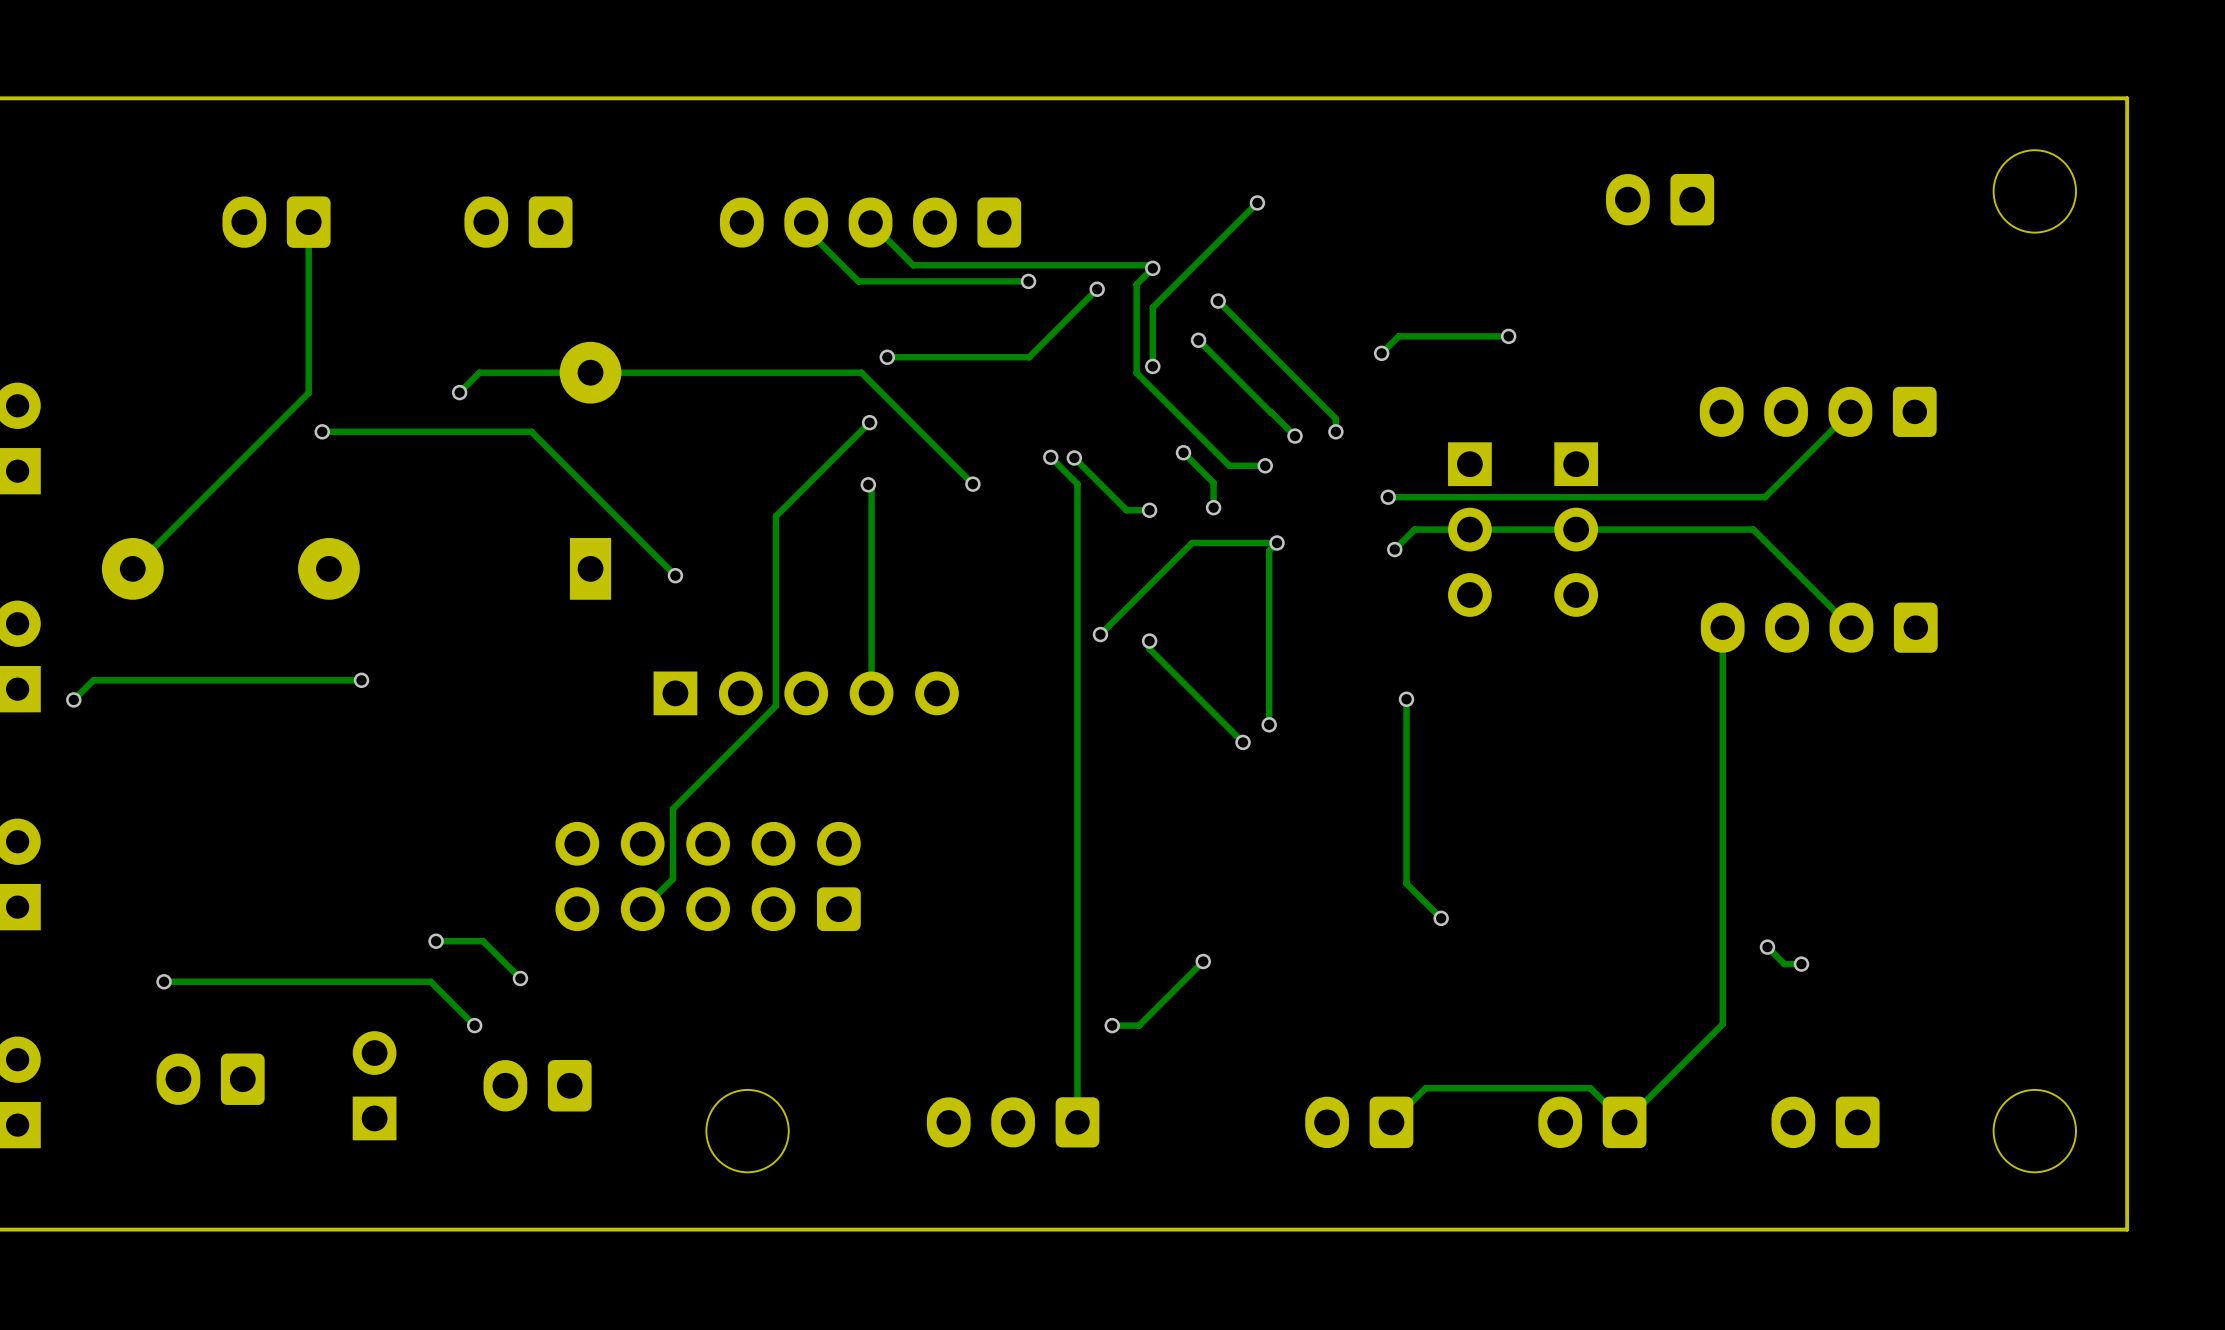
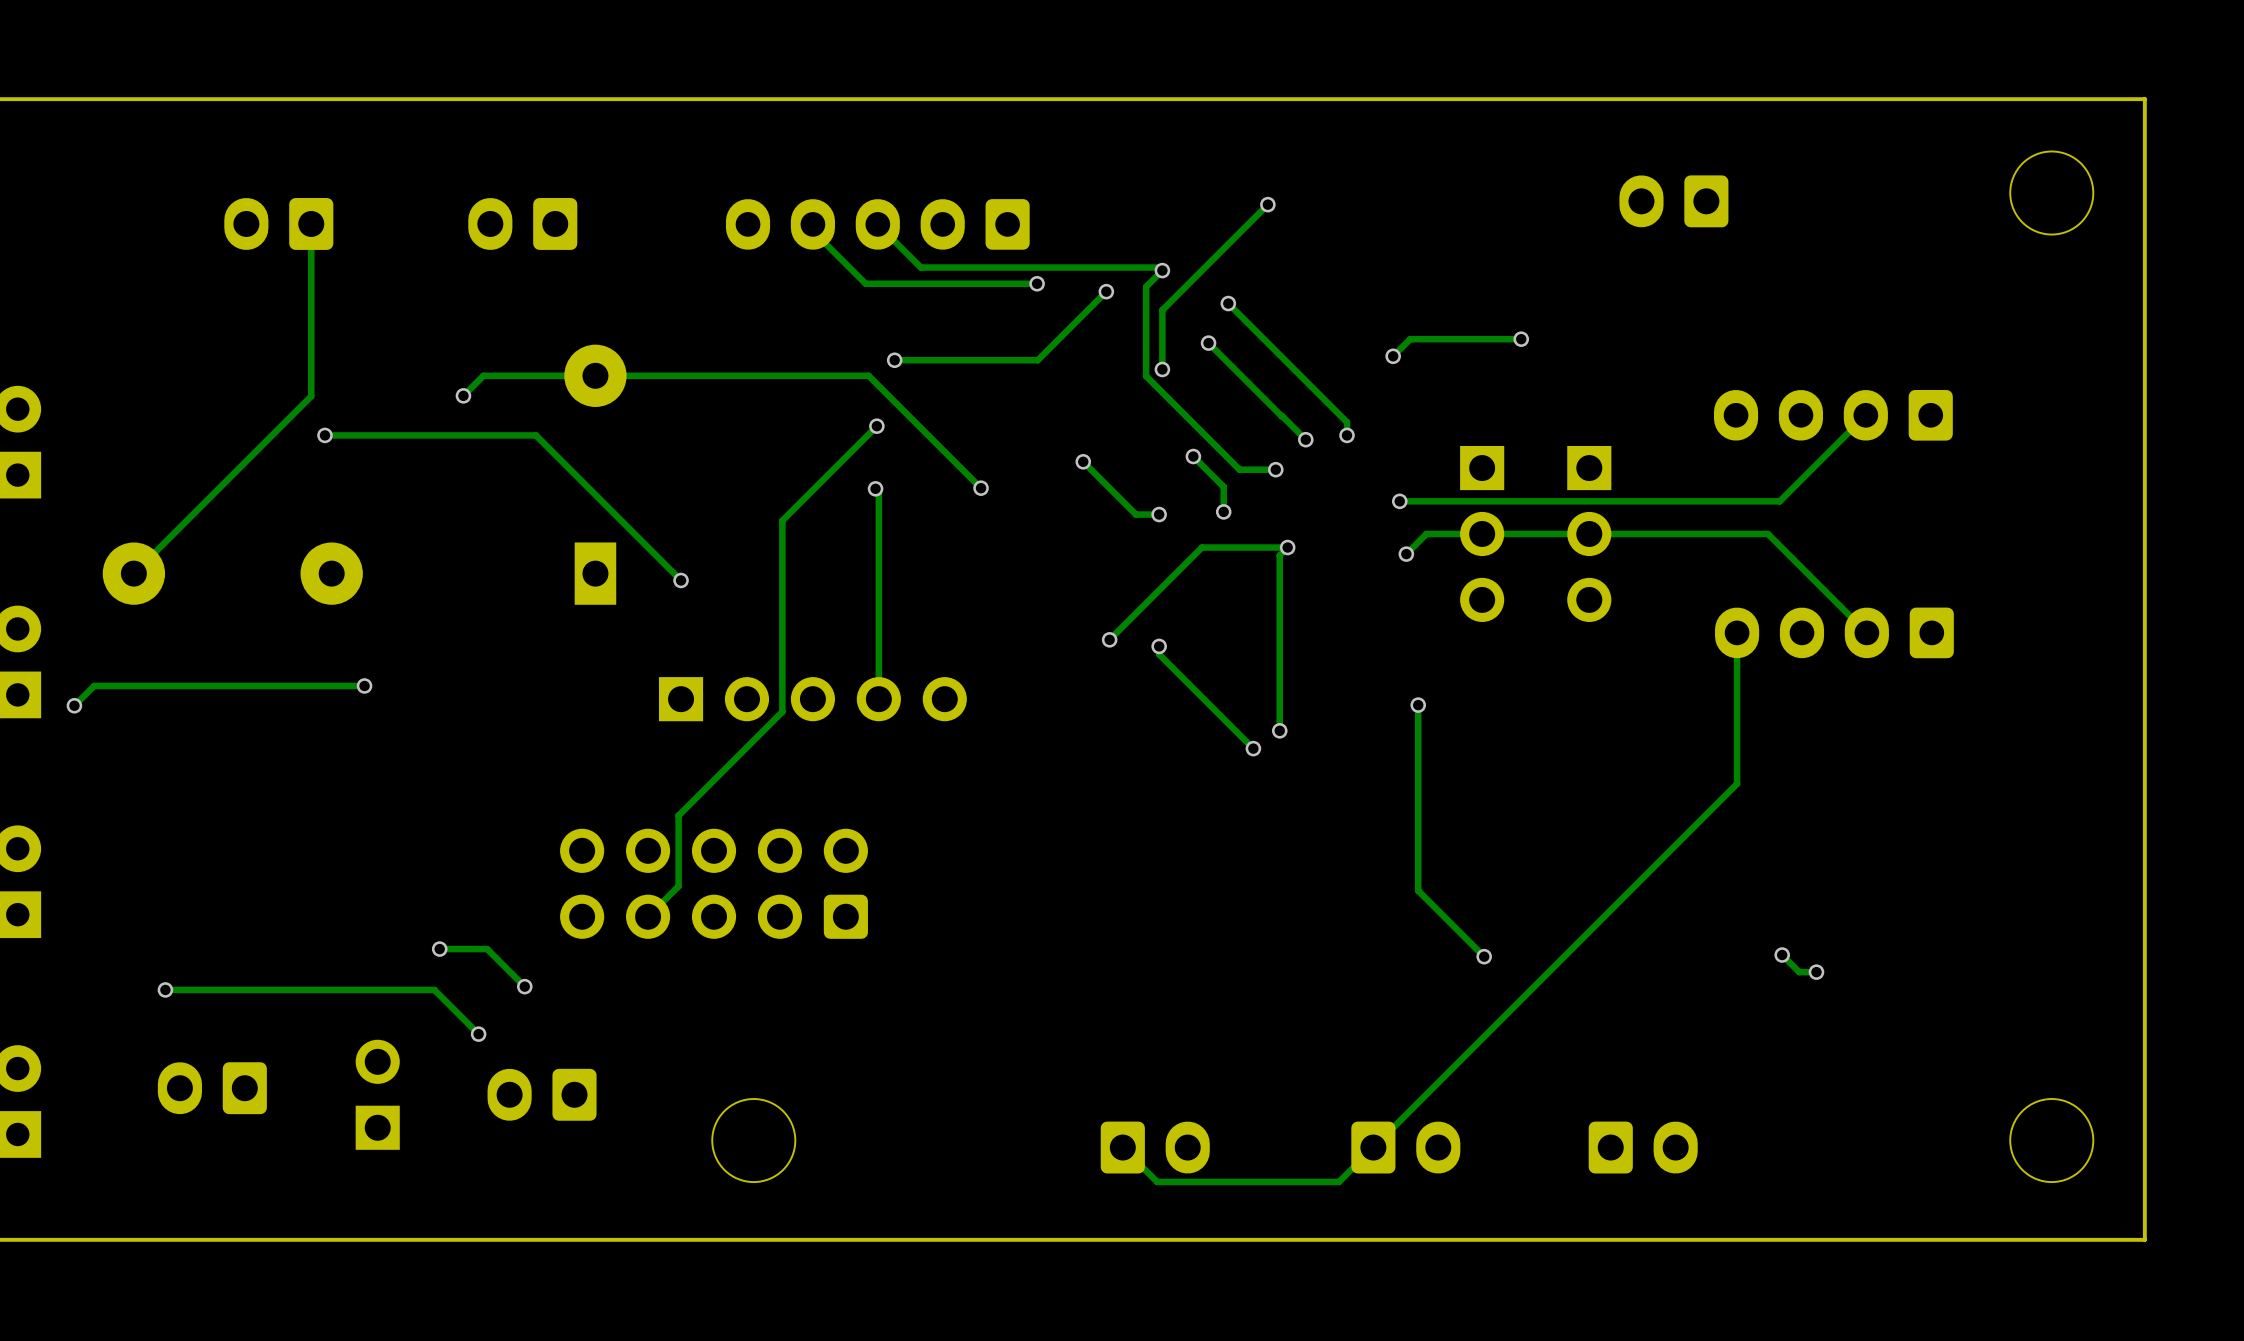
track: (1050, 457) (1077, 484) (1077, 1122) -> none
via: (1050, 457) -> none
track: (1722, 777) (1722, 1024) (1624, 1122) (1590, 1088) (1425, 1088) (1391, 1122) -> (1737, 783) (1338, 1181) (1157, 1181) (1122, 1147)
track: (1406, 883) (1441, 918) -> (1418, 890) (1484, 956)
via position: (1441, 918) -> (1484, 956)
track: (1203, 961) (1139, 1025) (1112, 1025) -> none
via: (1203, 961) -> none
via: (1112, 1025) -> none
part: (1013, 1122) -> none
part rotation: 0° (1359, 1122) -> 180° (1405, 1147)
part rotation: 0° (1592, 1122) -> 180° (1643, 1147)
part: (1825, 1122) -> none
part: none -> (1155, 1147)

